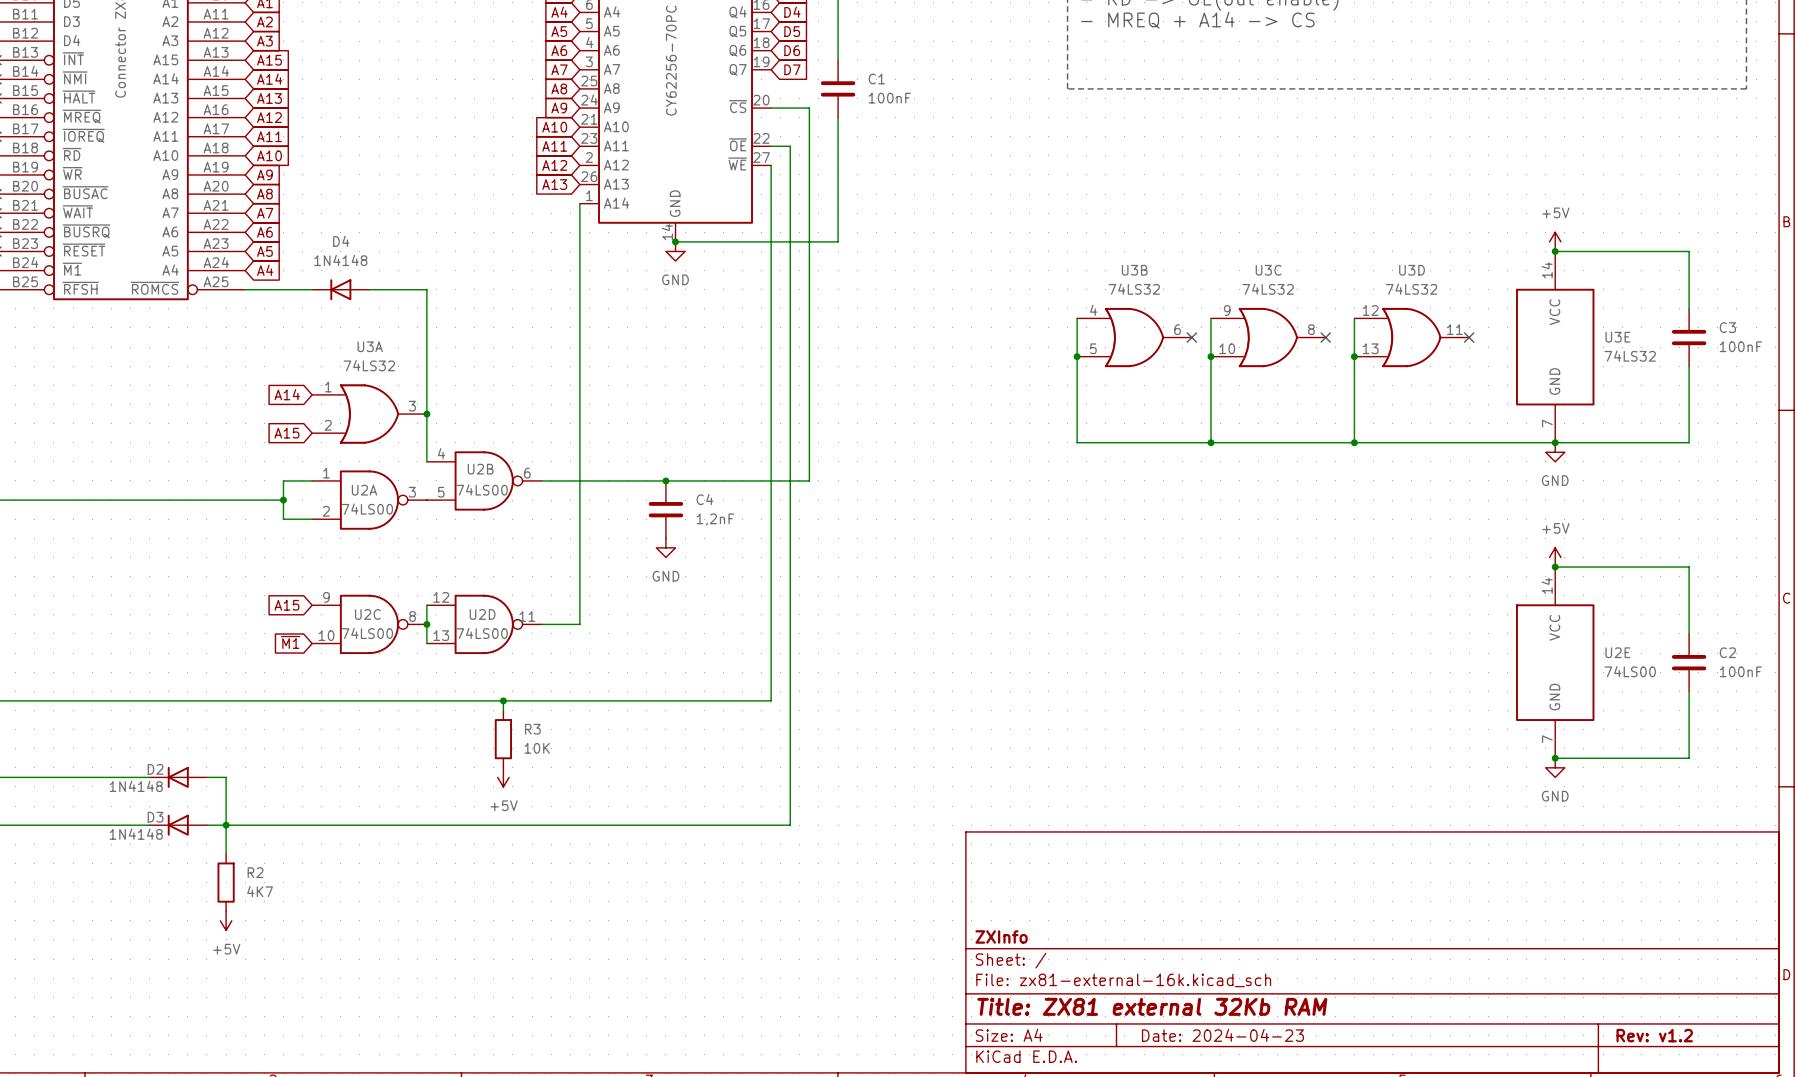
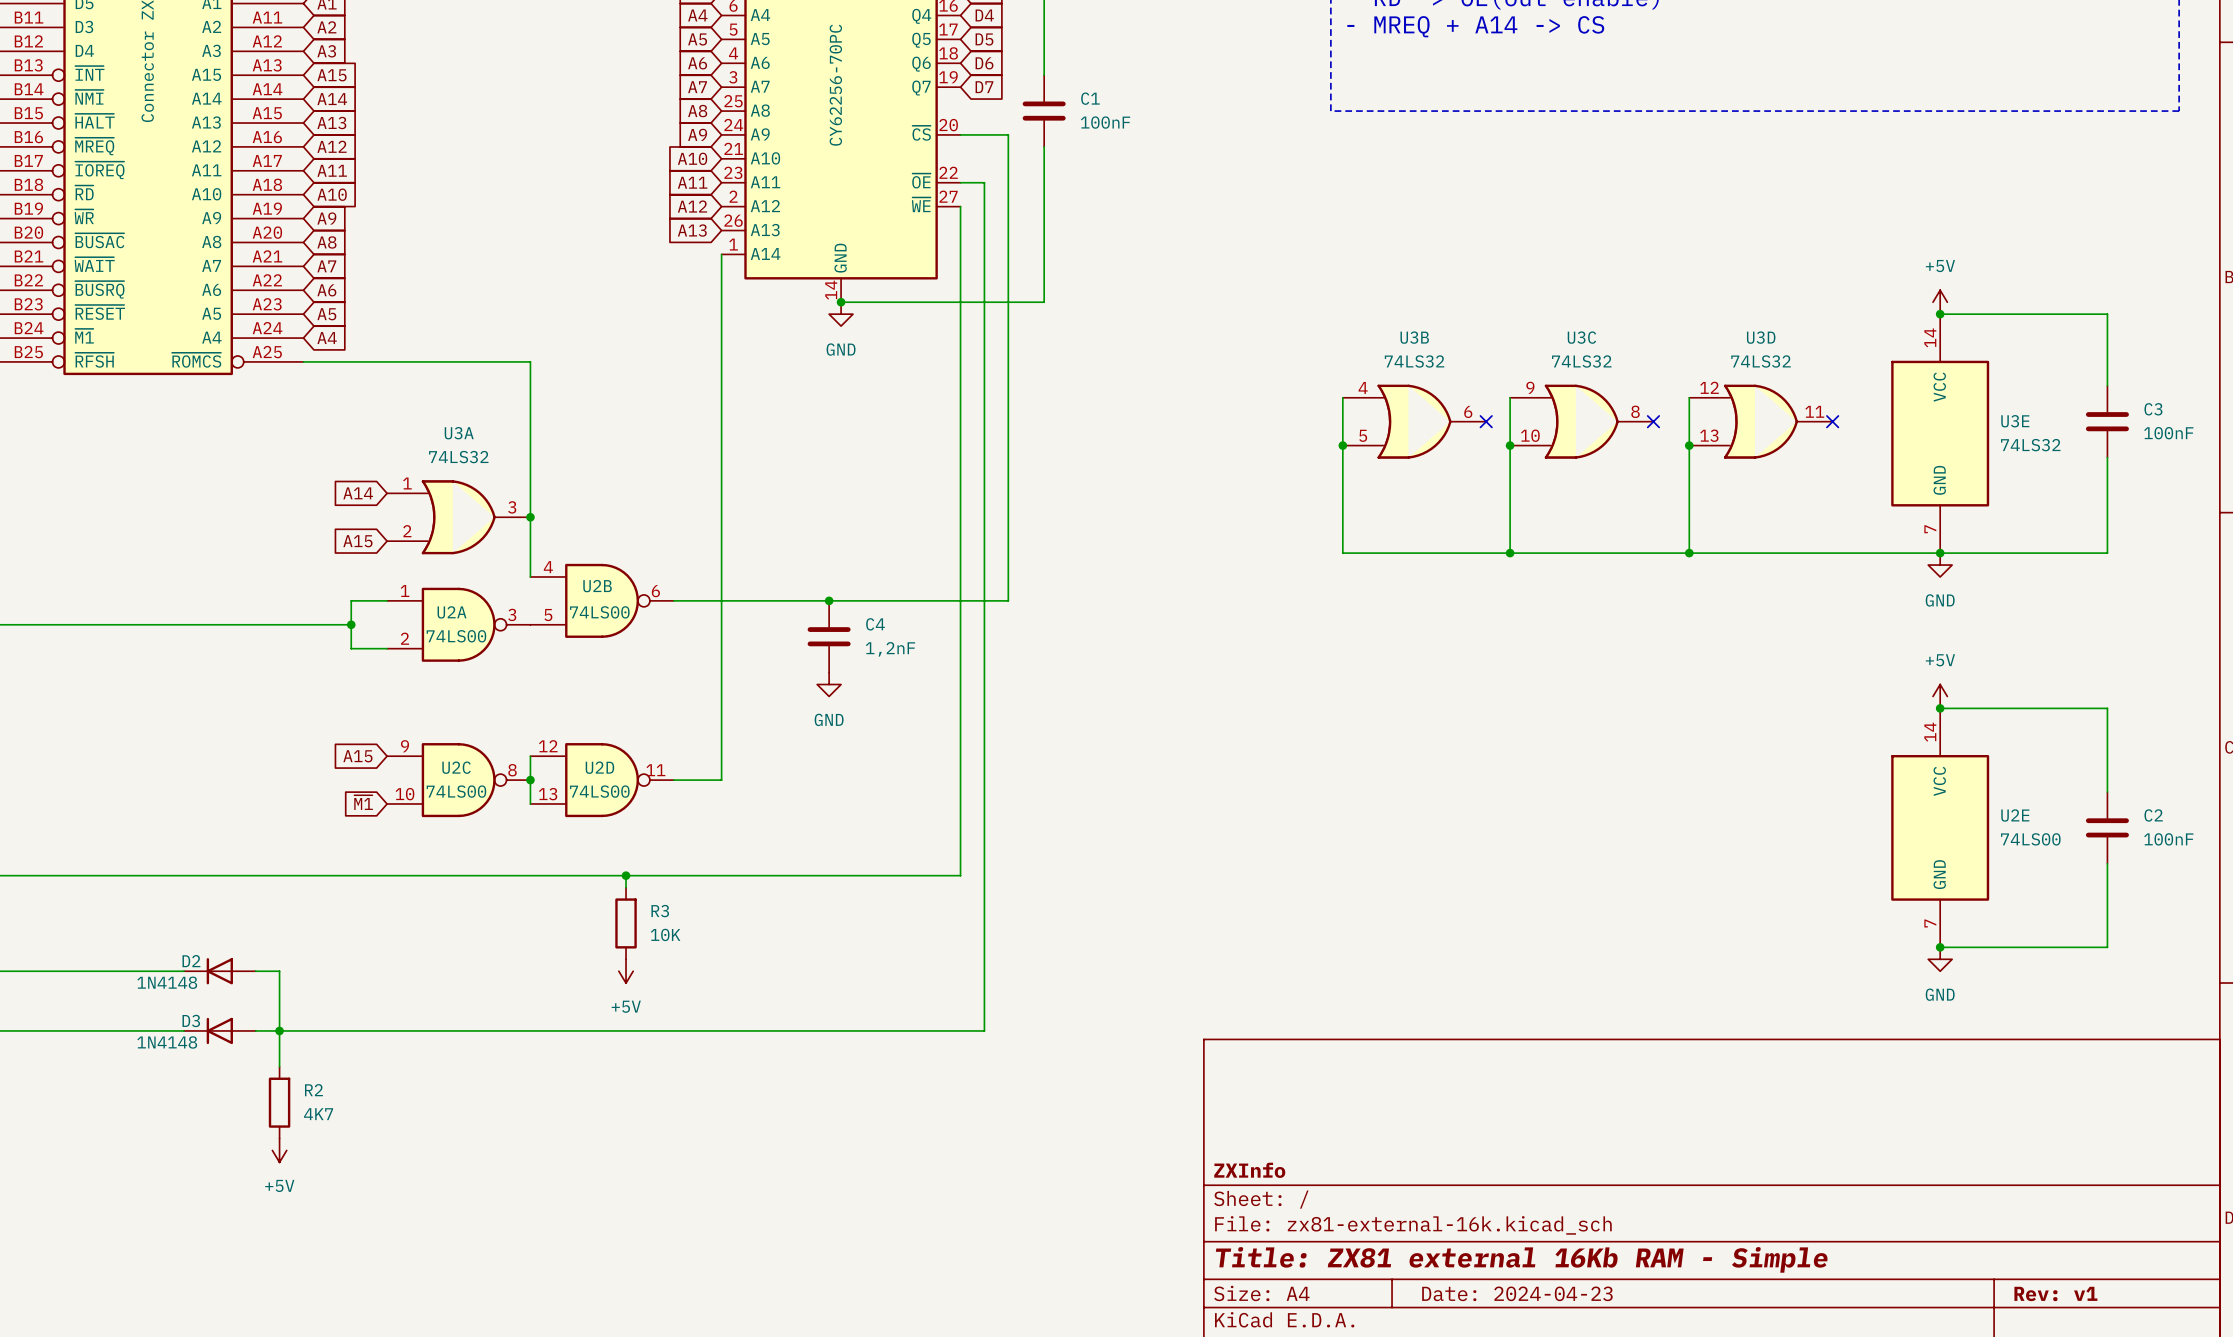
D4: 1N4148 (340, 289) -> none
title block: Title: ZX81 external 32Kb RAM (1152, 1006) -> Title: ZX81 external 16Kb RAM - Simple (1521, 1259)
title block: Rev: v1.2 (1654, 1035) -> Rev: v1 (2055, 1293)

